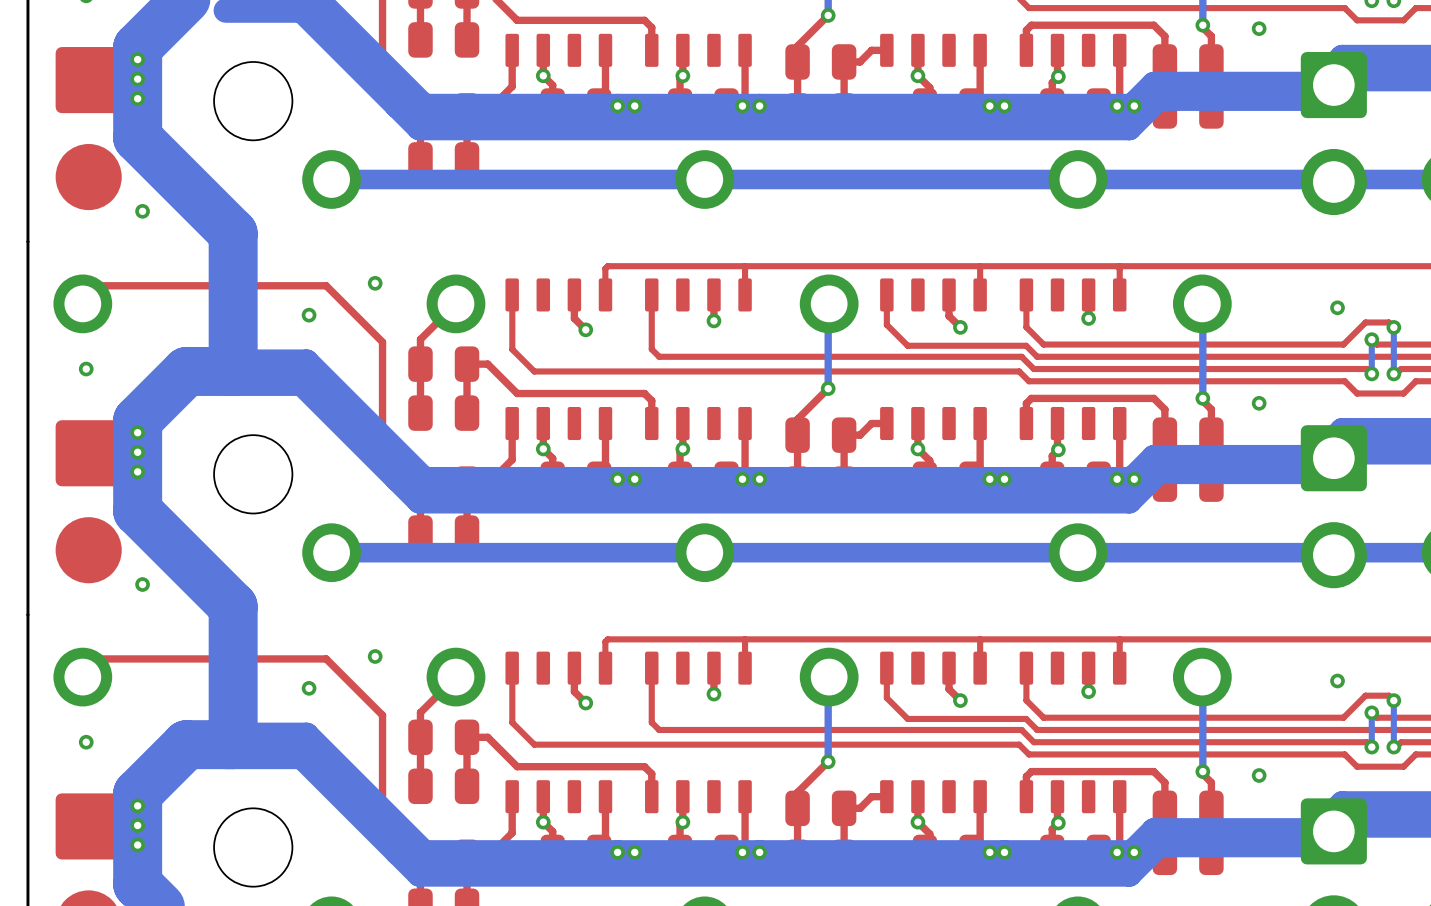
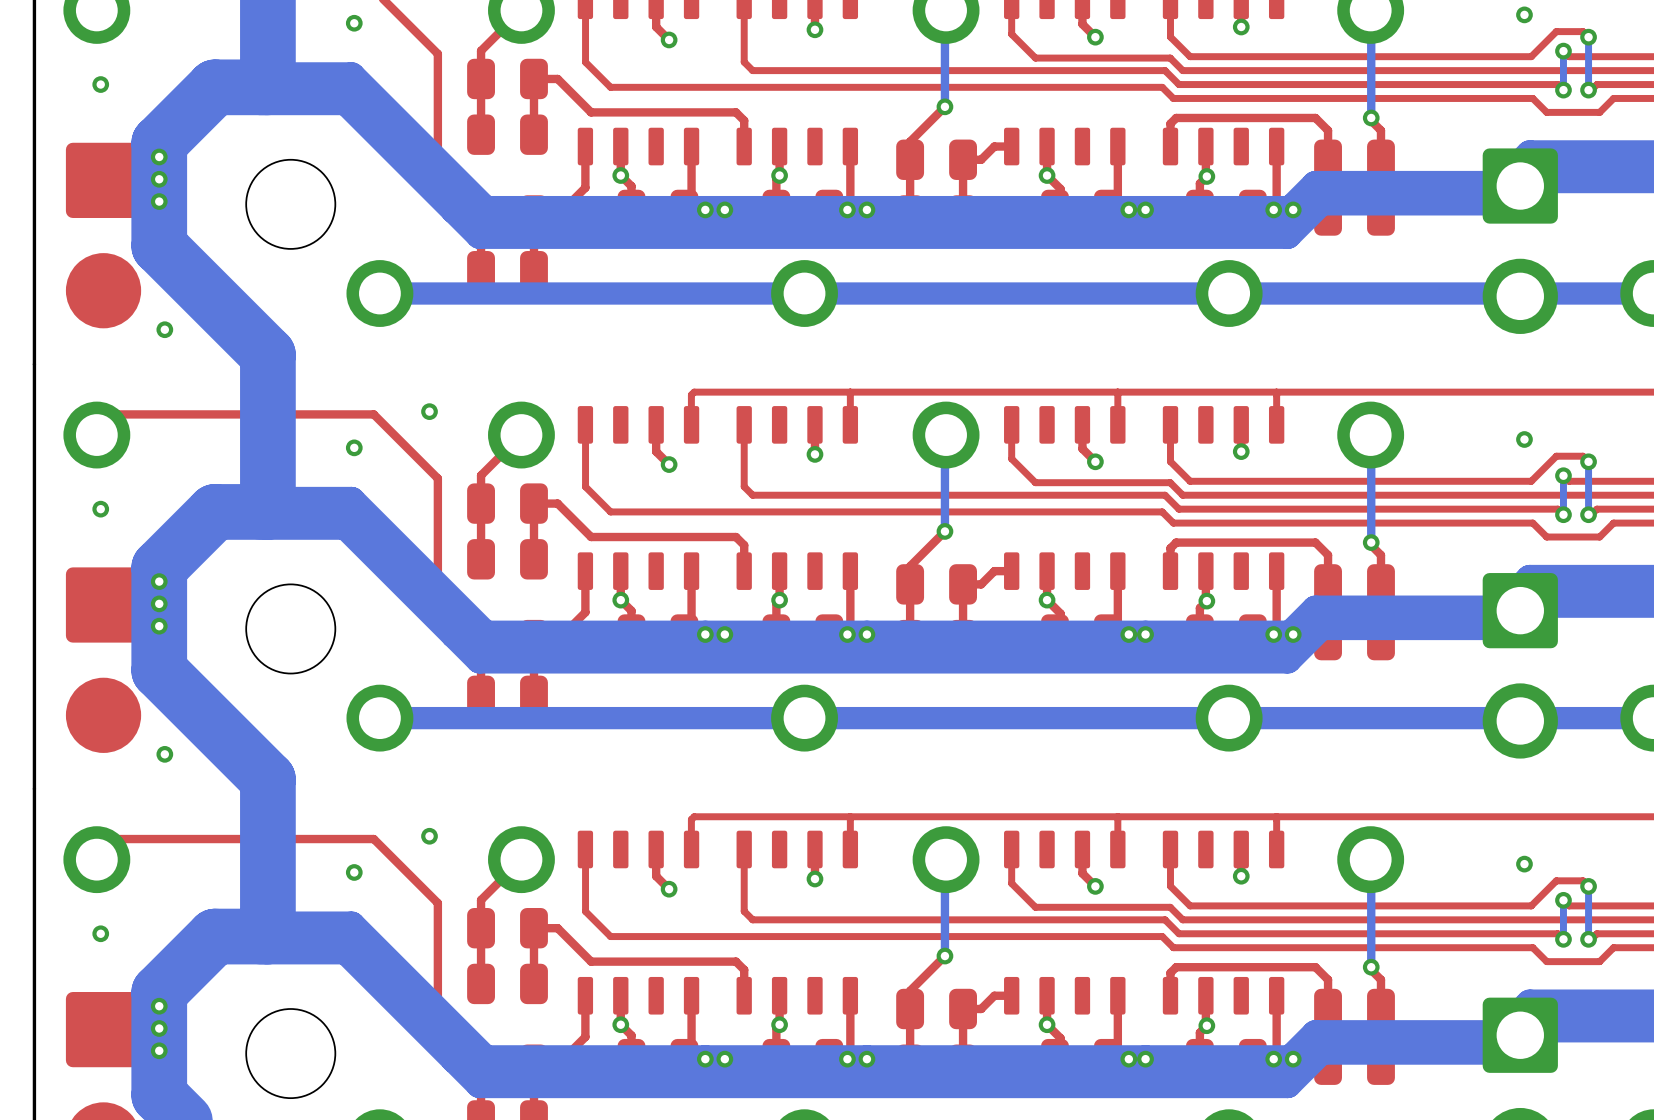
via: (1259, 28) -> none
via: (1259, 403) -> none
via: (1259, 775) -> none

